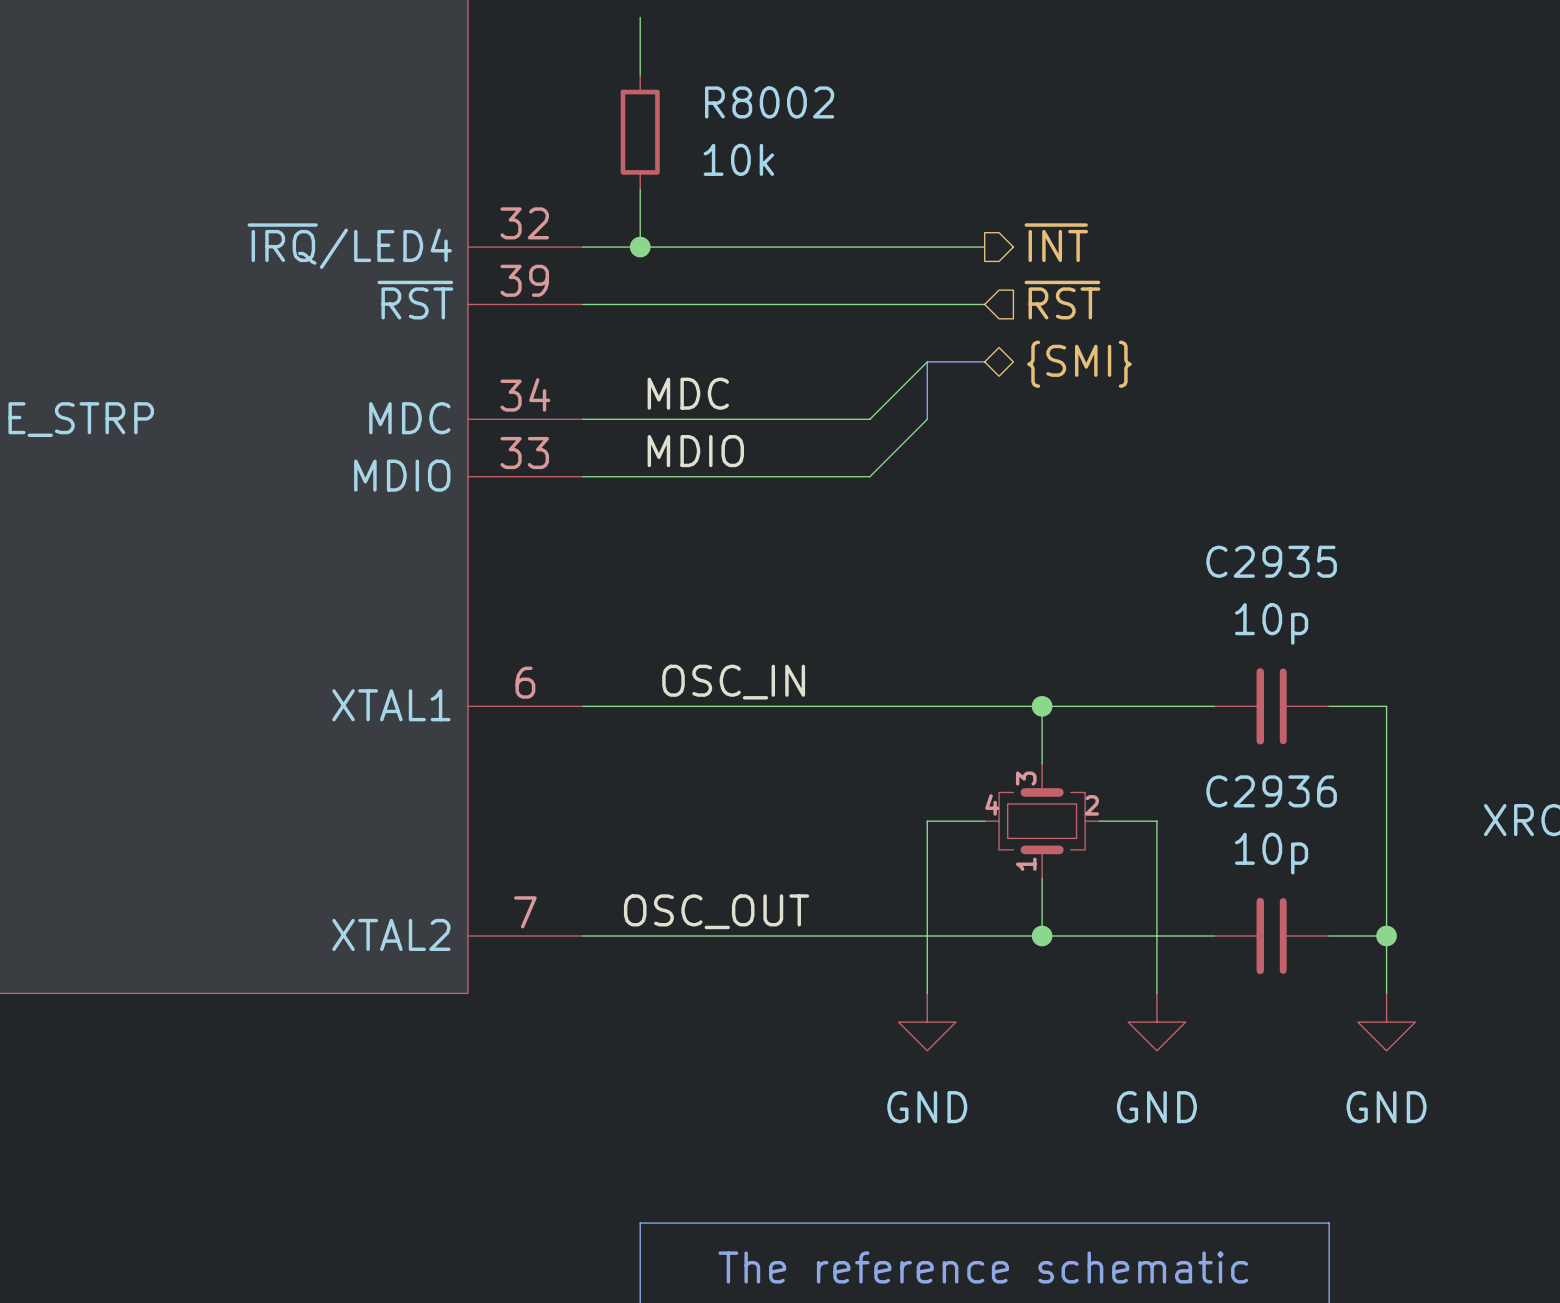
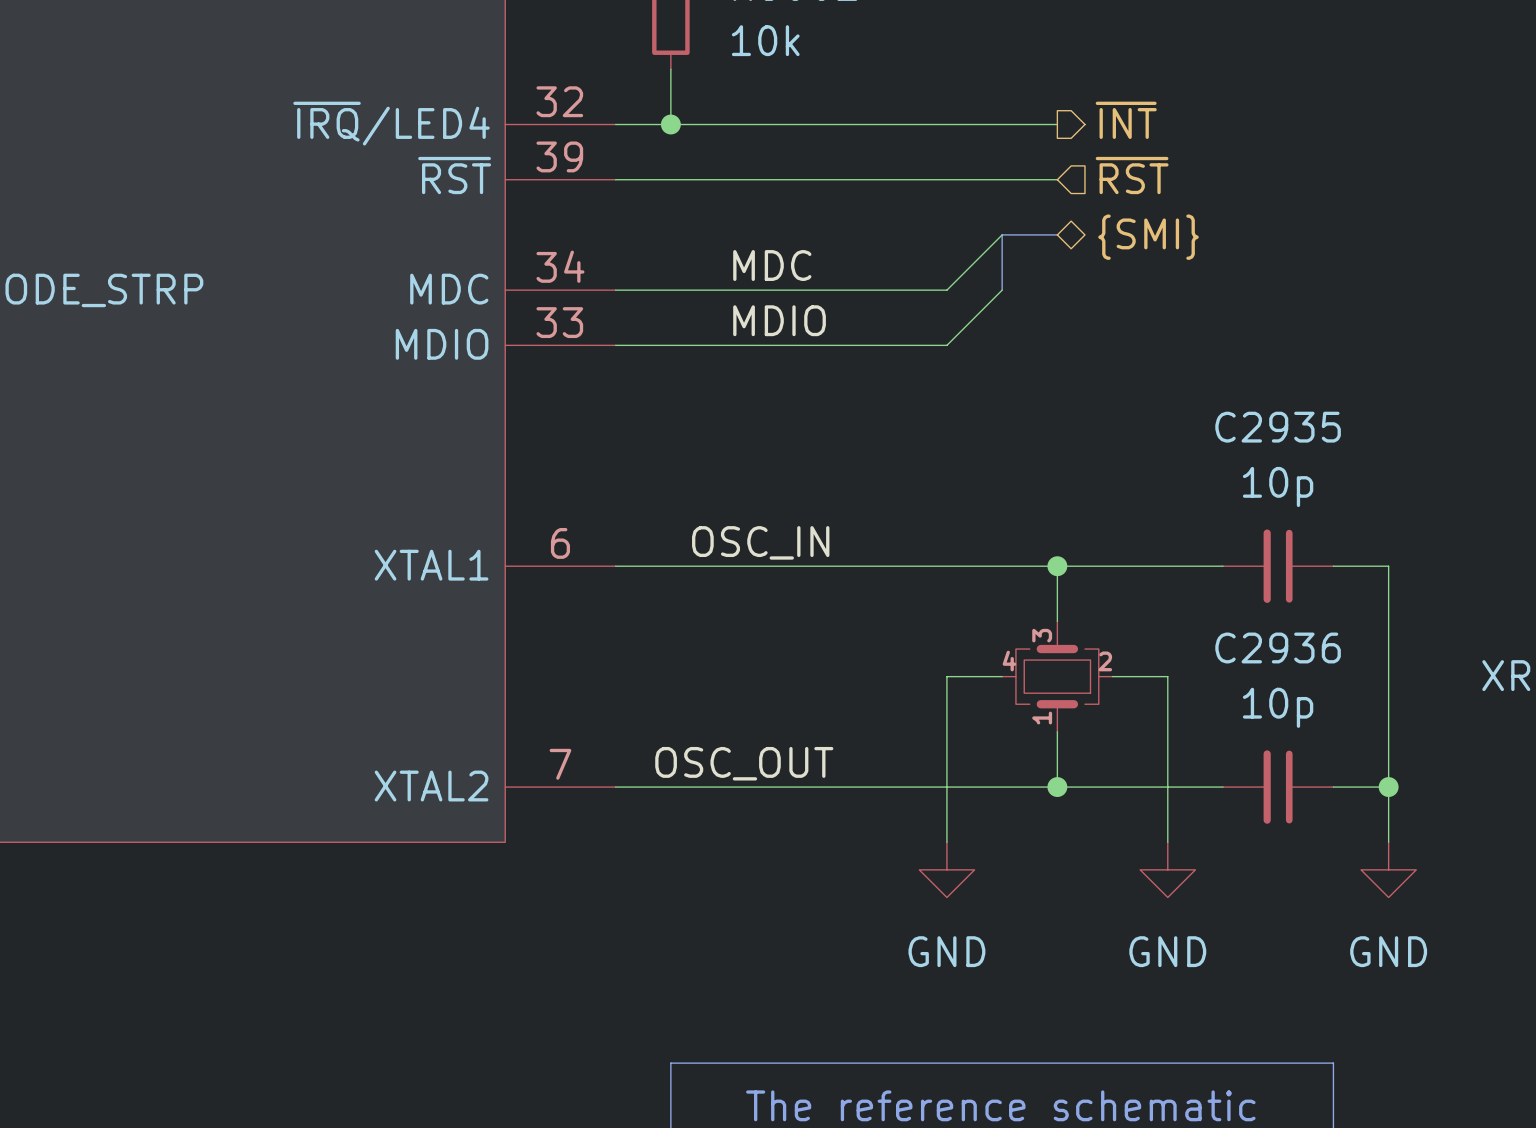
hierarchical label position: ~{INT} (1056, 242) -> ~{INT} (1126, 120)
wire: none -> (1002, 124) (1057, 124)
hierarchical label position: ~{RST} (1062, 300) -> ~{RST} (1132, 175)
wire: none -> (1002, 179) (1057, 179)
wire: (927, 361) (869, 419) -> (1002, 234) (946, 290) (891, 290)
bus: (984, 361) (927, 361) (927, 419) -> (1057, 234) (1002, 234) (1002, 290)
hierarchical label position: {SMI} (1079, 364) -> {SMI} (1148, 237)
label position: MDC (688, 393) -> MDC (772, 265)
wire: (927, 419) (869, 476) -> (1002, 290) (946, 345) (891, 345)
label position: MDIO (695, 451) -> MDIO (779, 320)

